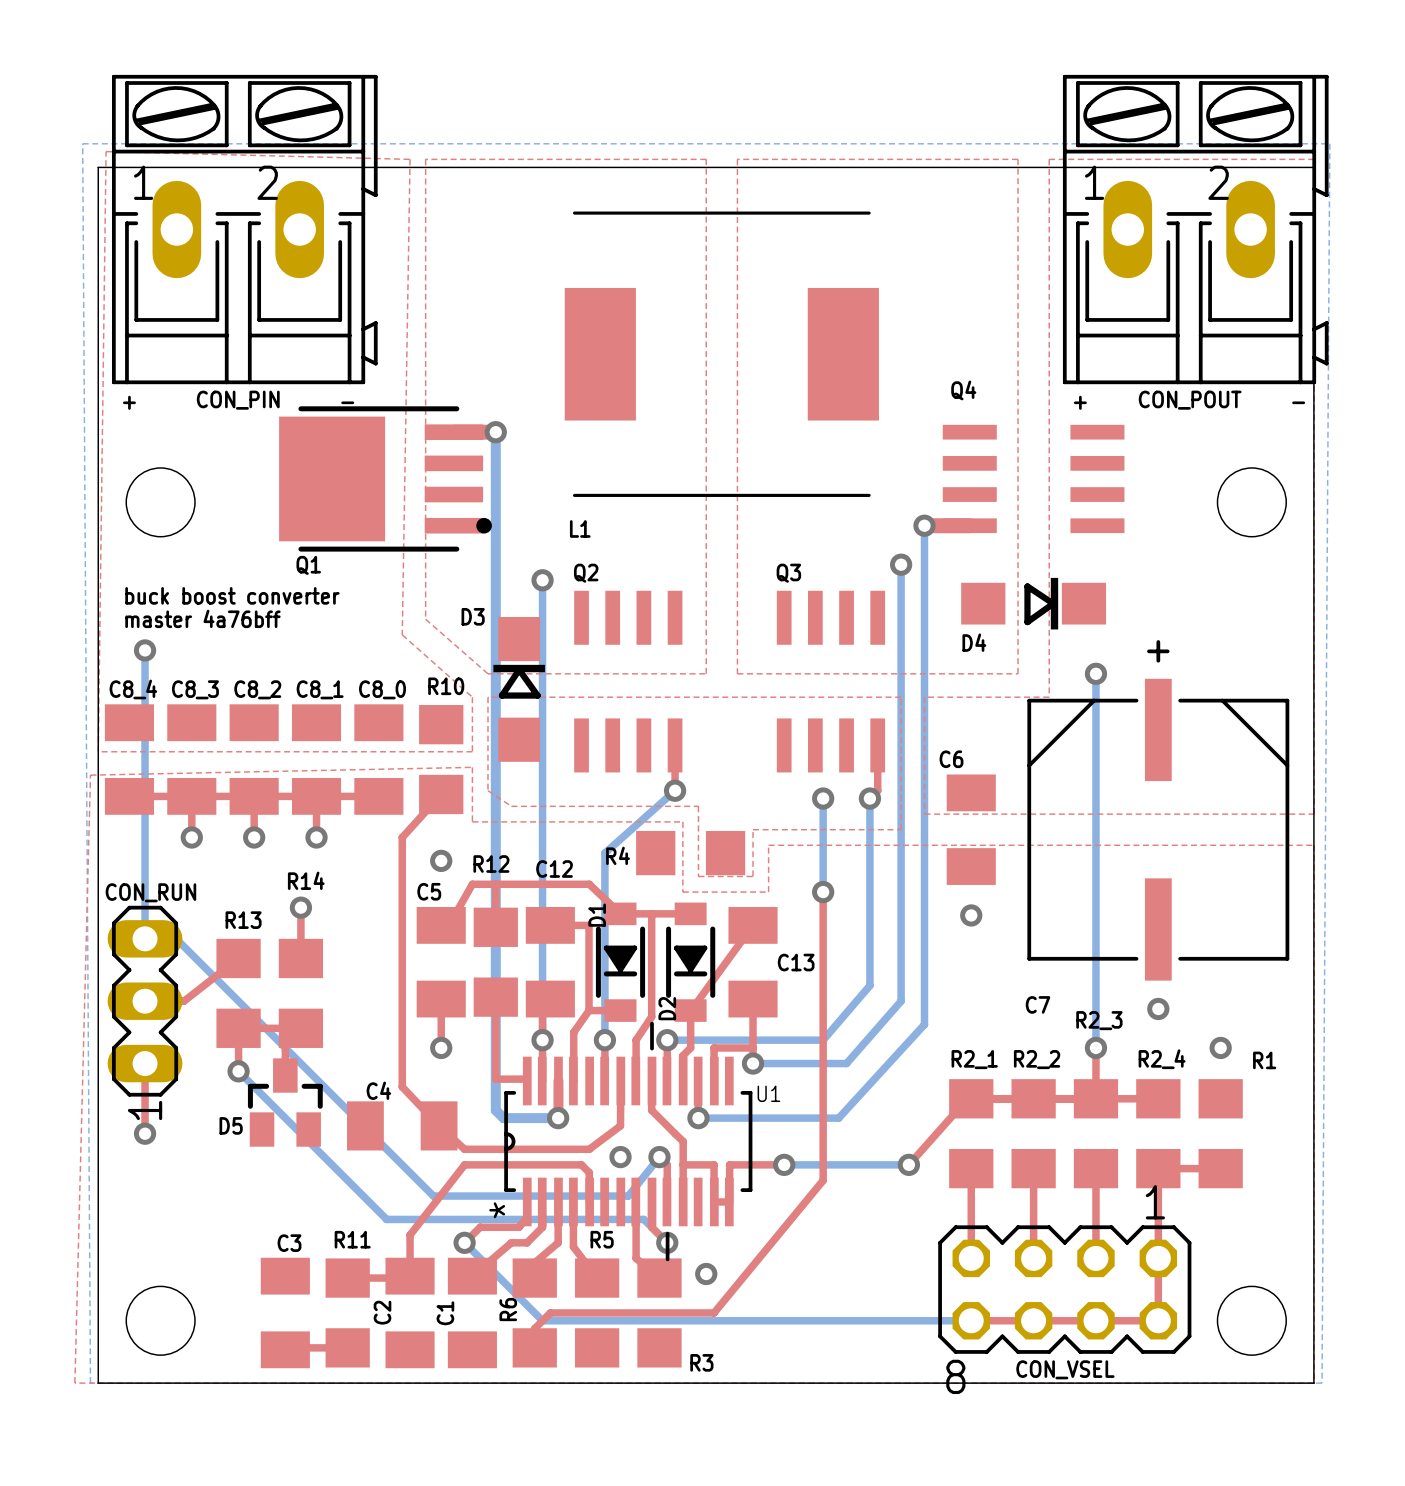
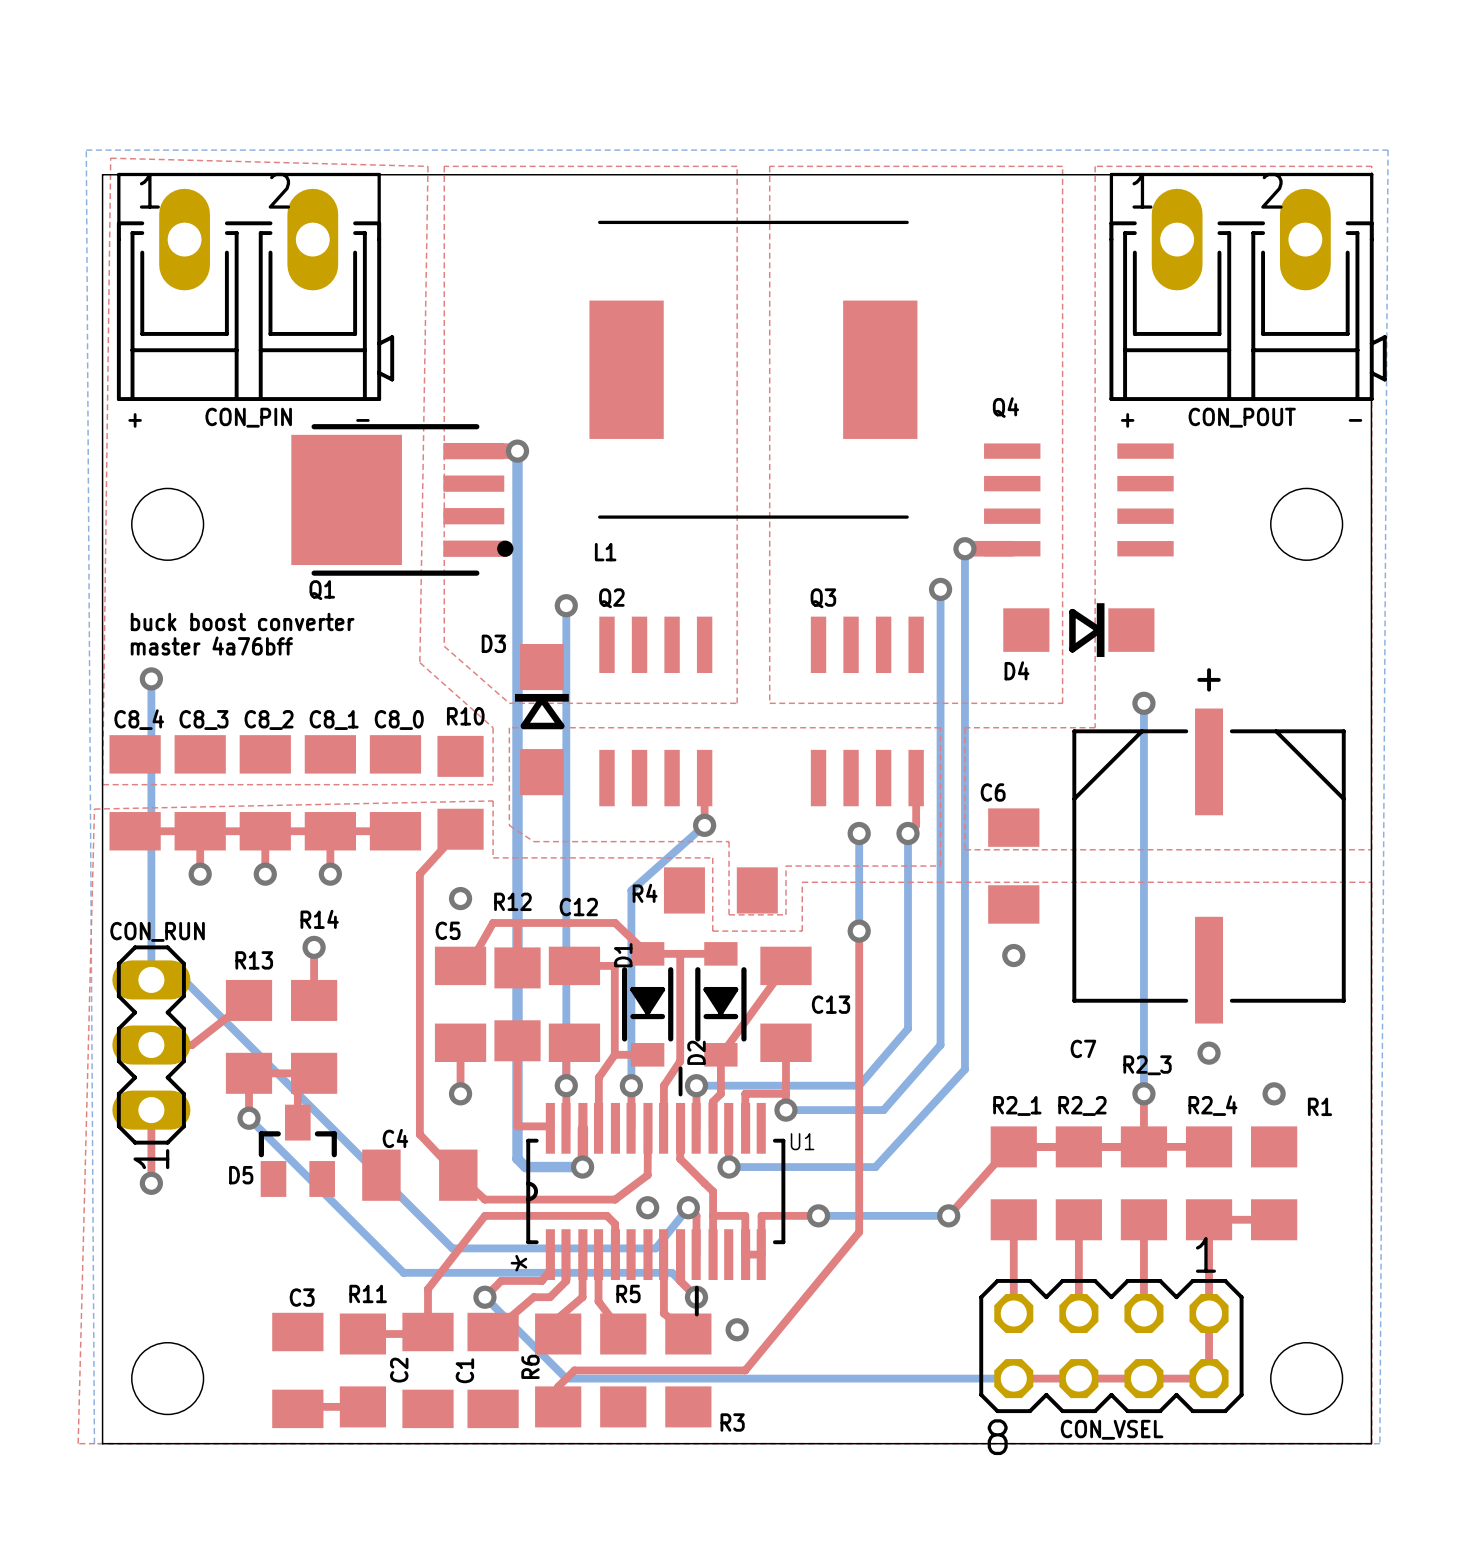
CON_PIN: (244, 229) -> none
CON_POUT: (1195, 229) -> none
CON_PIN: none -> (255, 286)
CON_POUT: none -> (1248, 286)

